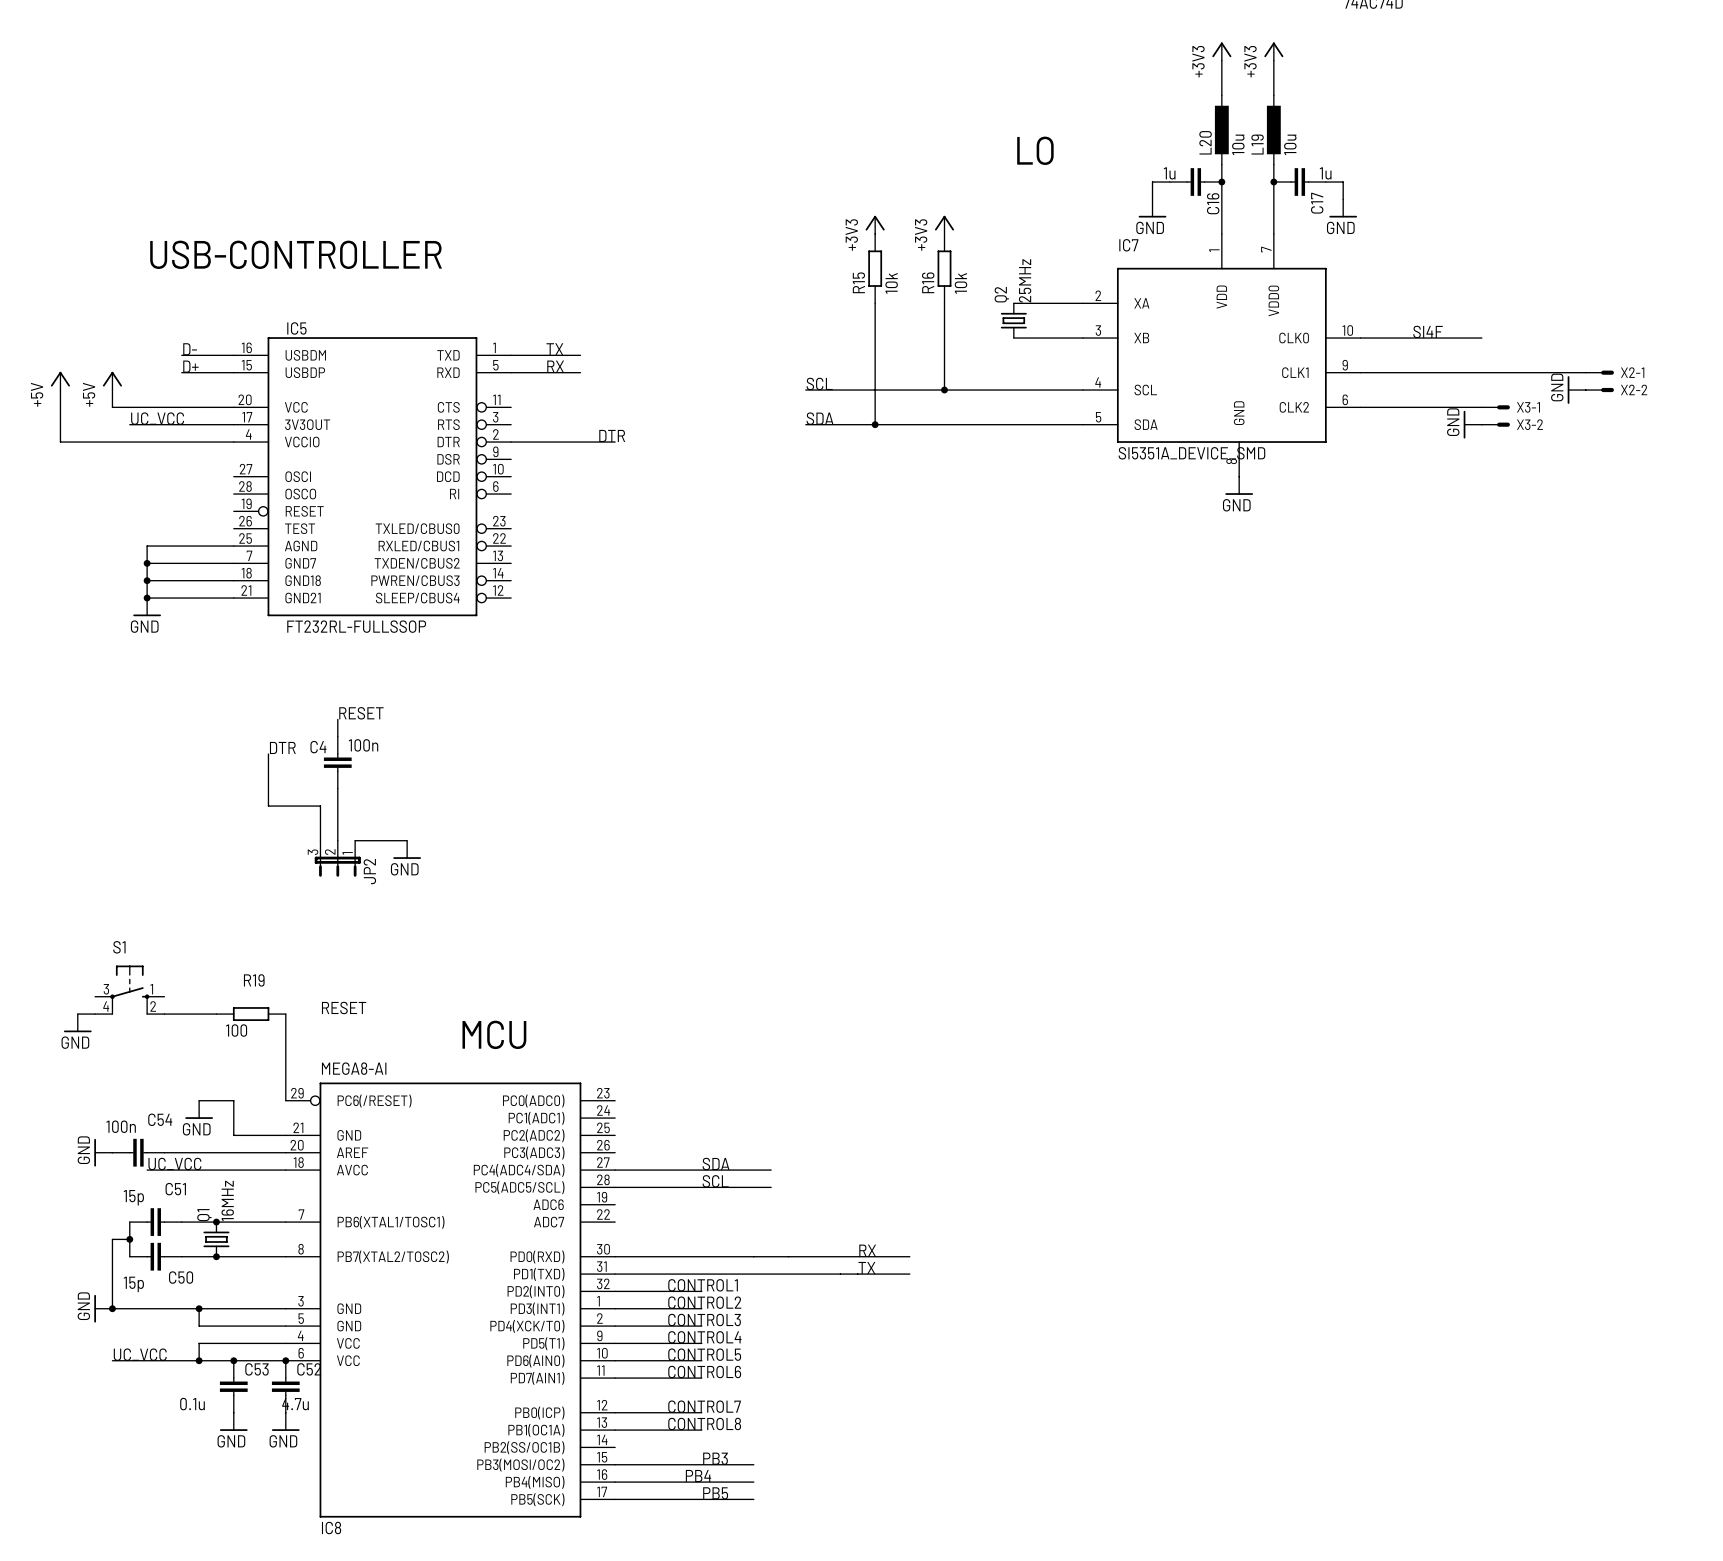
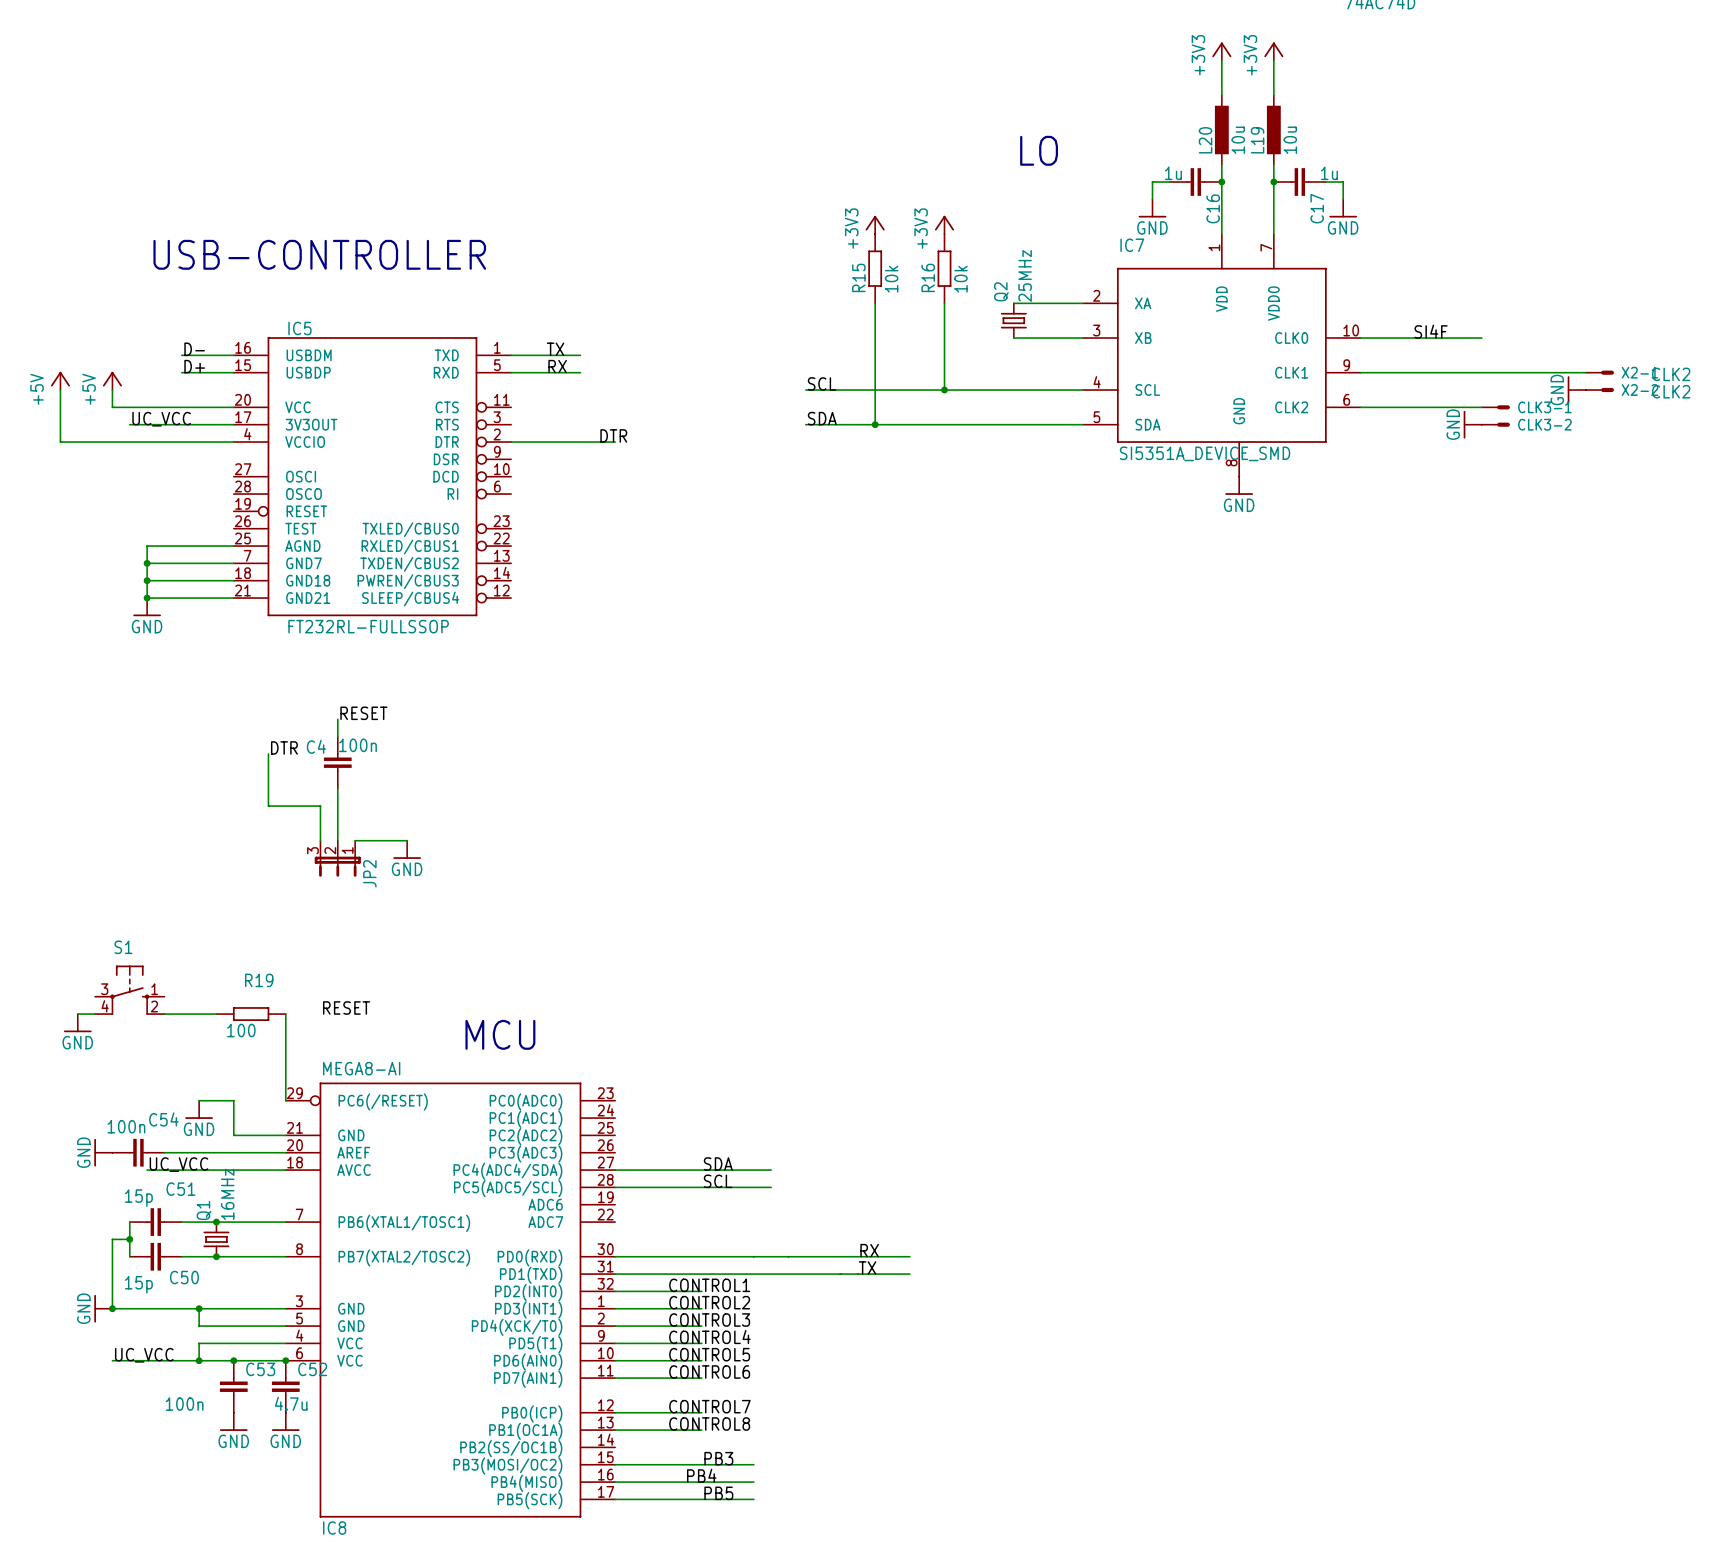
X2-1 value: none -> CLK2 (1671, 374)
X2-2 value: none -> CLK2 (1671, 391)
X3-1 name: X3-1 (1528, 407) -> CLK3-1 (1544, 407)
X3-2 name: X3-2 (1529, 424) -> CLK3-2 (1544, 424)
C53 value: 0.1u (192, 1404) -> 100n (184, 1404)

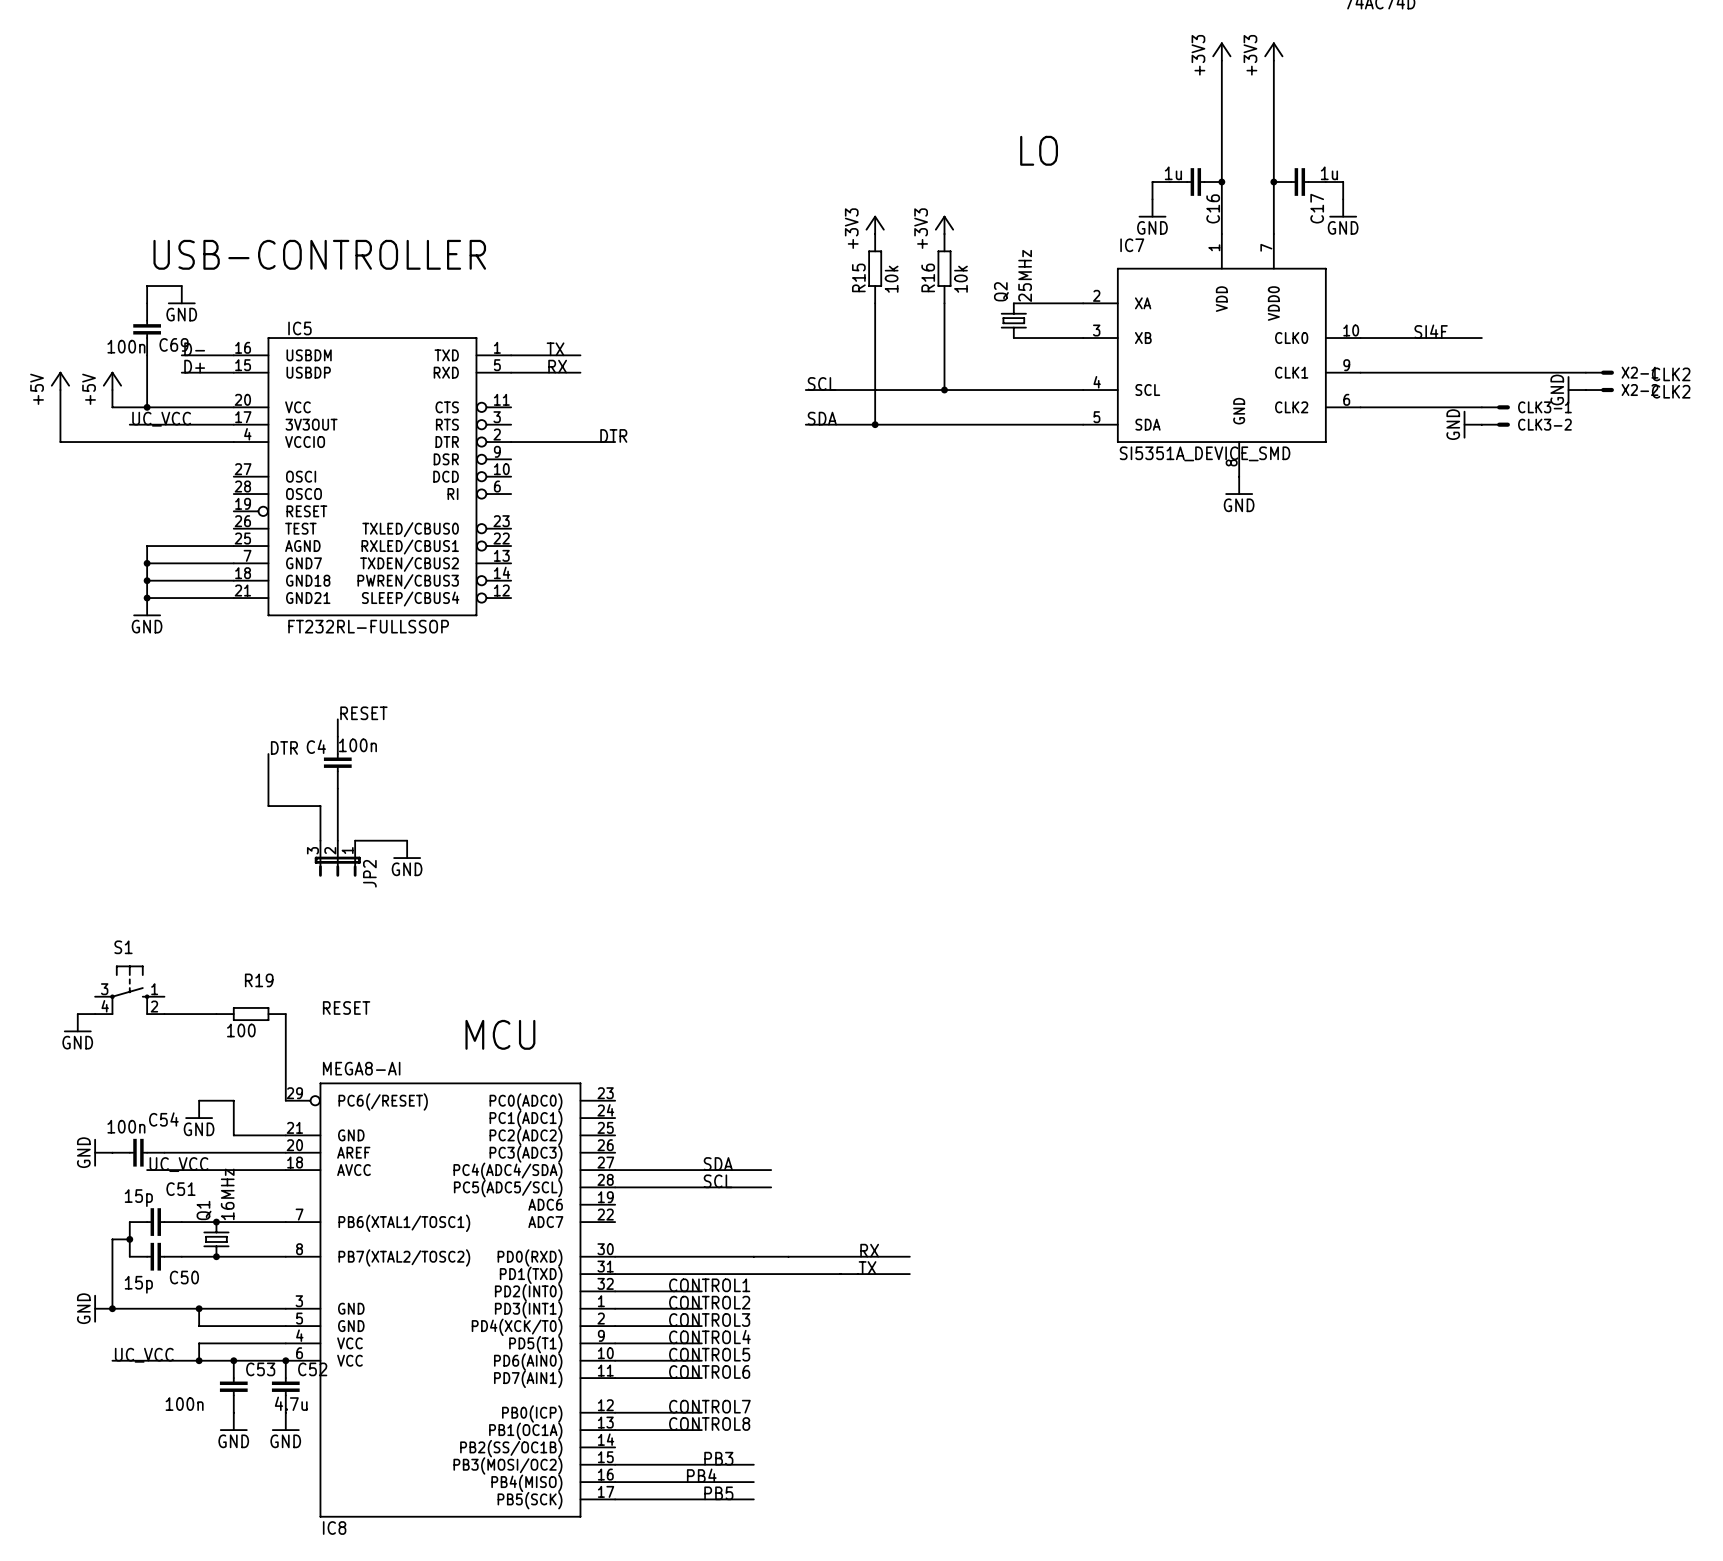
L20: 10u (1221, 130) -> none
L19: 10u (1273, 130) -> none
wire: none -> (181, 286) (147, 286) (147, 303)
power symbol: none -> GND (181, 295)
C69: none -> 100n (147, 329)
wire: none -> (147, 355) (147, 407)
junction: none -> (147, 407)

